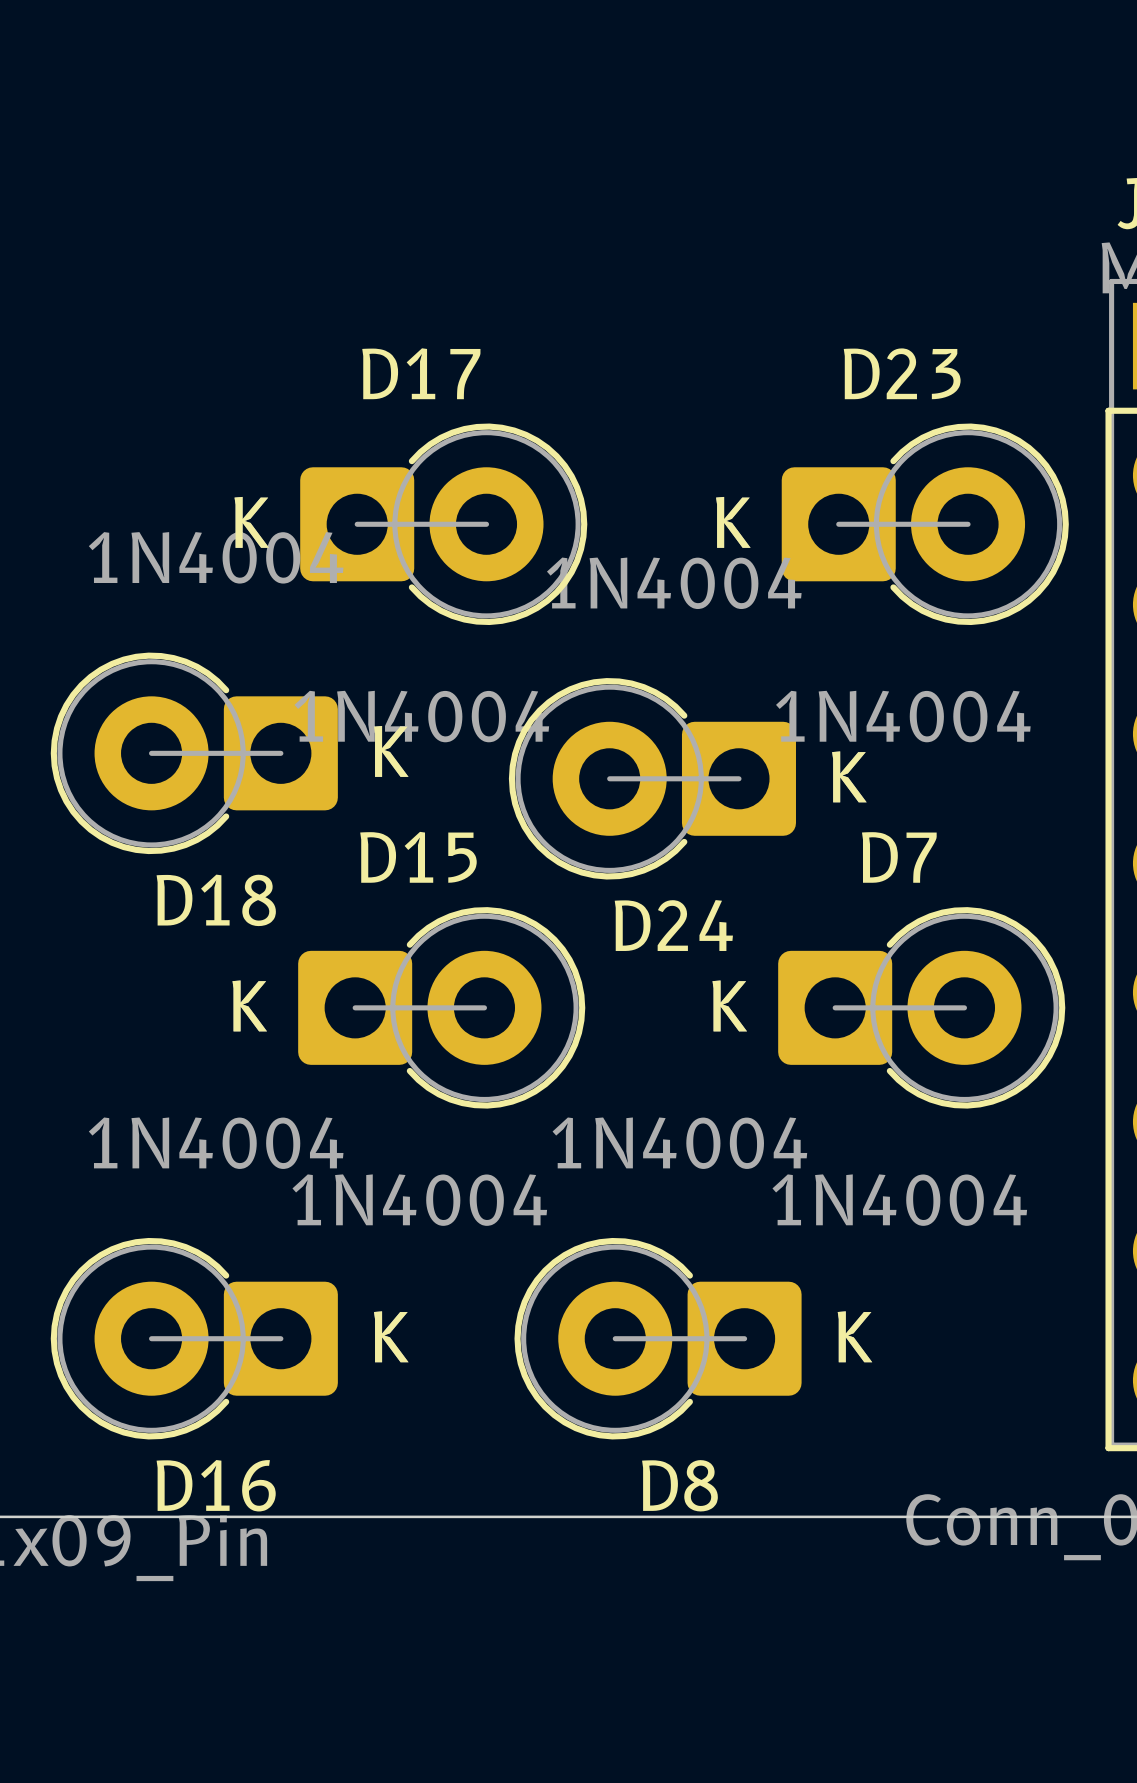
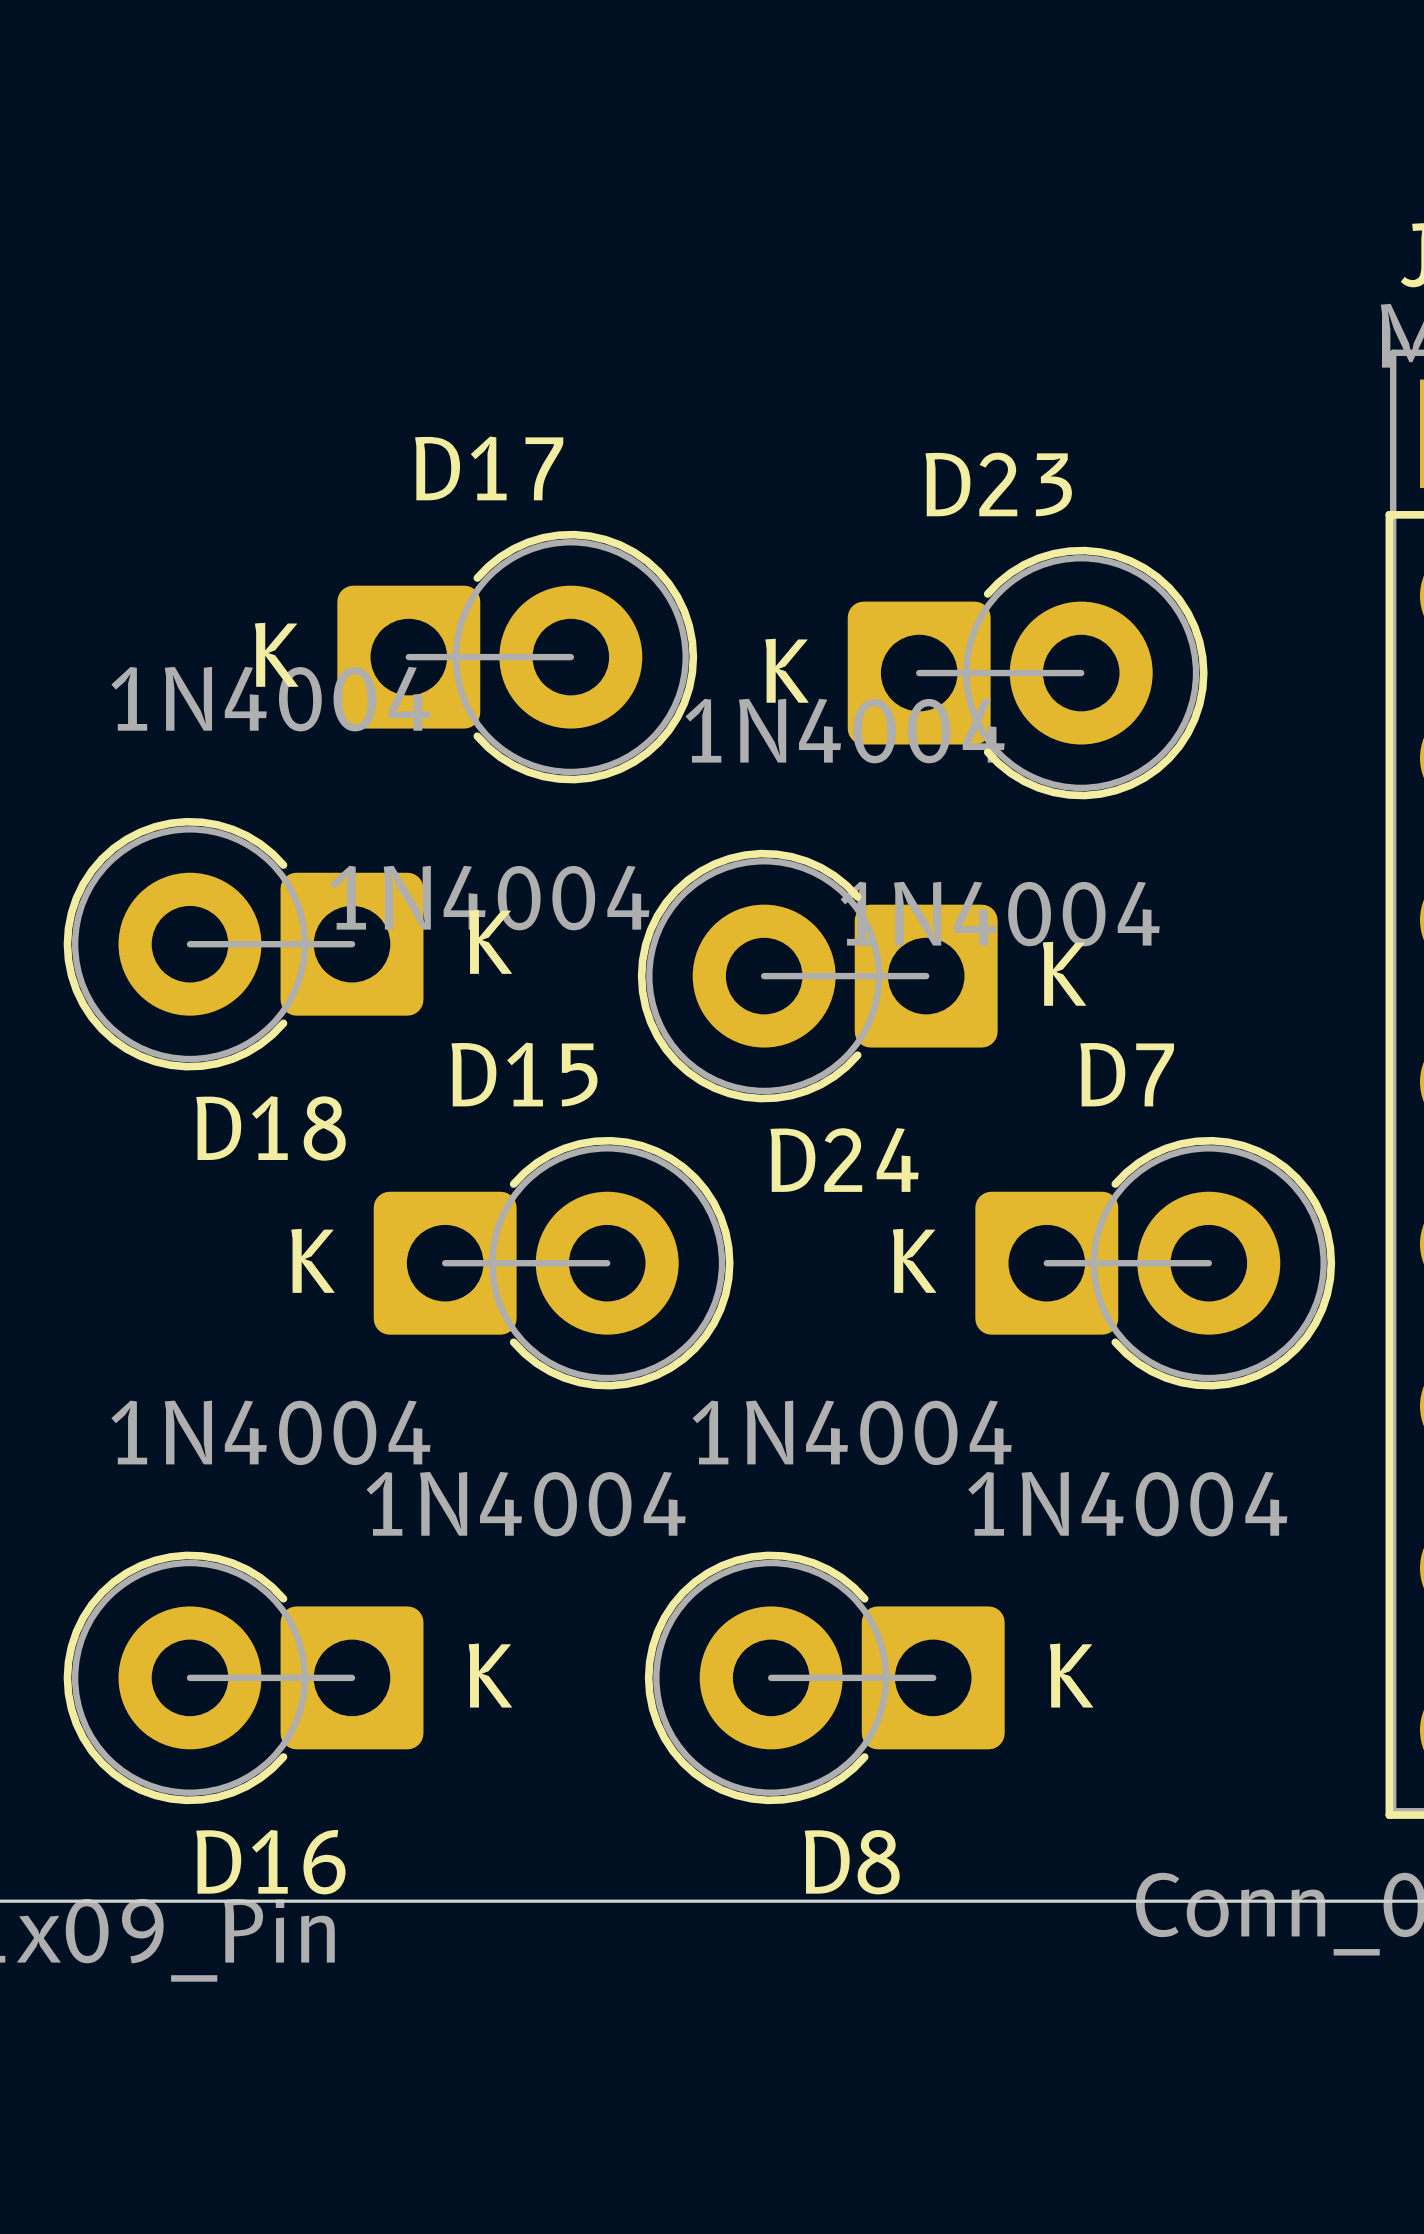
D17 position: (443, 524) -> (517, 657)
D23 position: (925, 524) -> (1027, 673)

